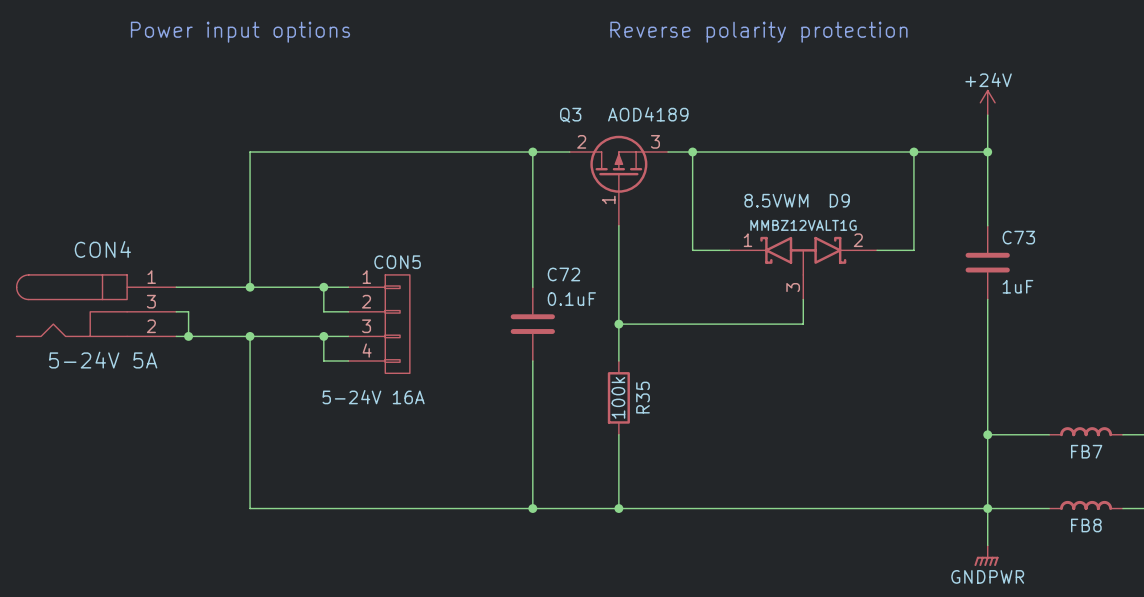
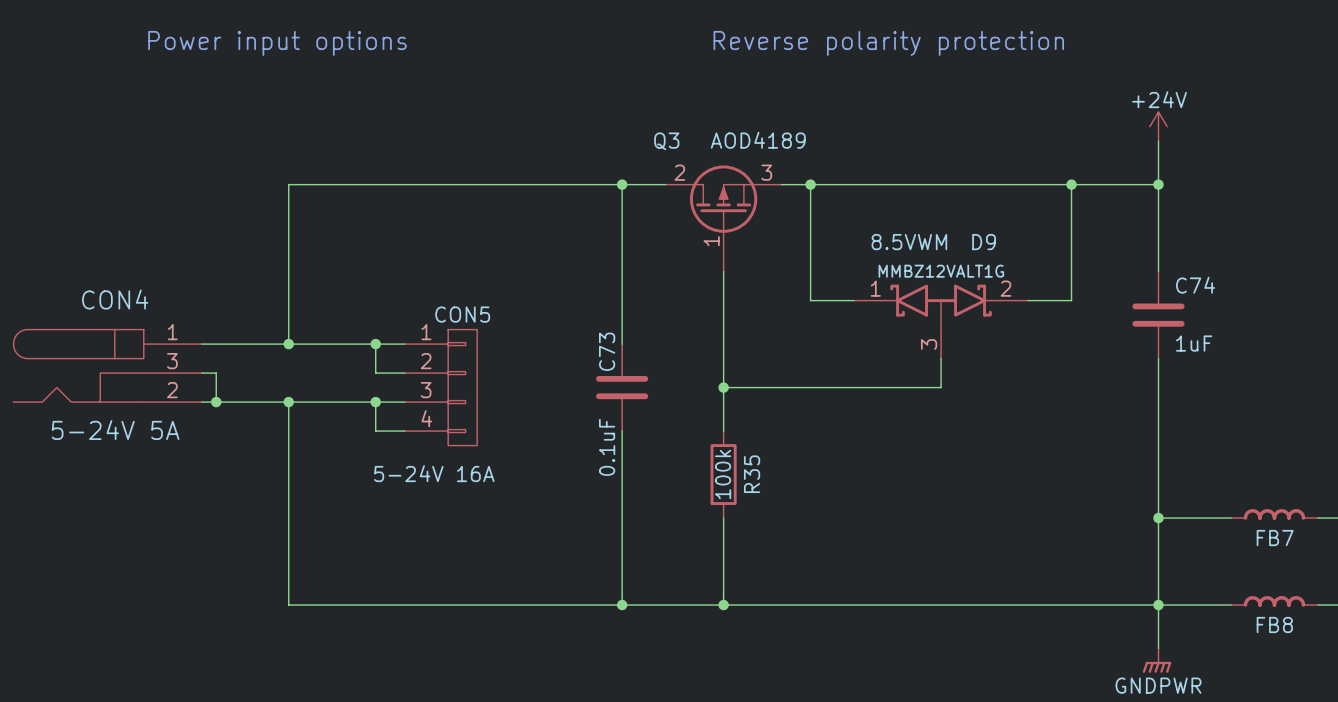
C73 name: C73 (1018, 237) -> C74 (1195, 285)
C72 name: C72 (563, 274) -> C73 (607, 351)
C72 value rotation: 0° (571, 299) -> 90° counterclockwise (607, 447)
C72 value position: 0.1uF (571, 299) -> 0.1uF (607, 447)

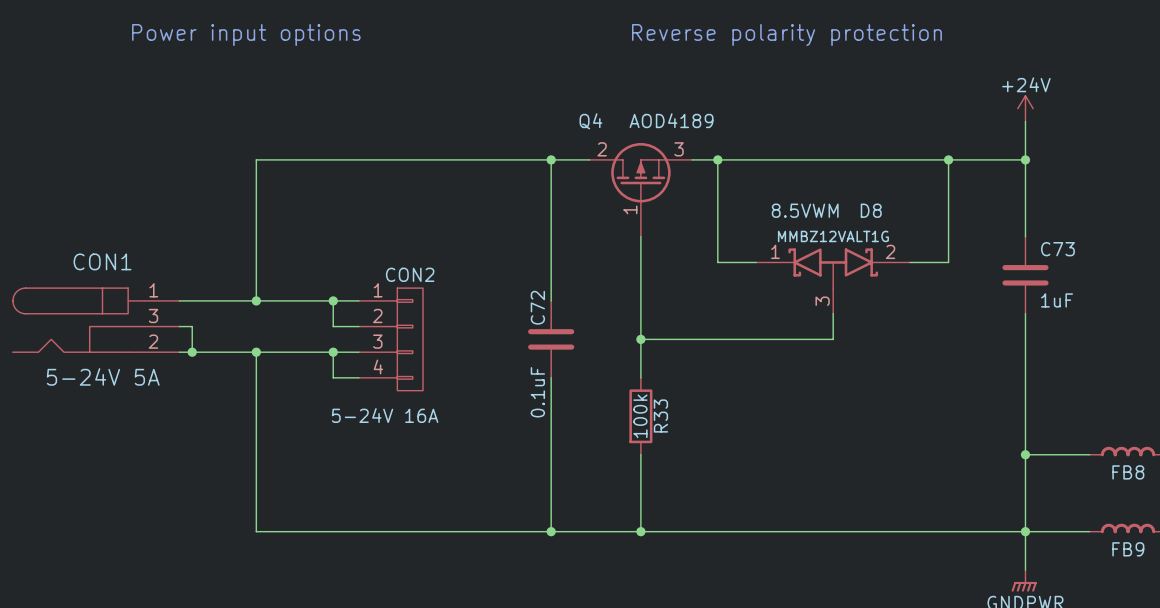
Q3 name: Q3 (666, 141) -> Q4 (590, 121)
D9 name: D9 (984, 242) -> D8 (871, 210)
C74 name: C74 (1195, 285) -> C73 (1057, 249)
CON4 name: CON4 (115, 299) -> CON1 (102, 261)
CON5 name: CON5 (462, 314) -> CON2 (410, 274)
C73 name: C73 (607, 351) -> C72 (537, 307)
R35 name: R35 (752, 474) -> R33 (660, 416)
FB7 name: FB7 (1275, 538) -> FB8 (1128, 472)
FB8 name: FB8 (1274, 624) -> FB9 (1128, 549)

